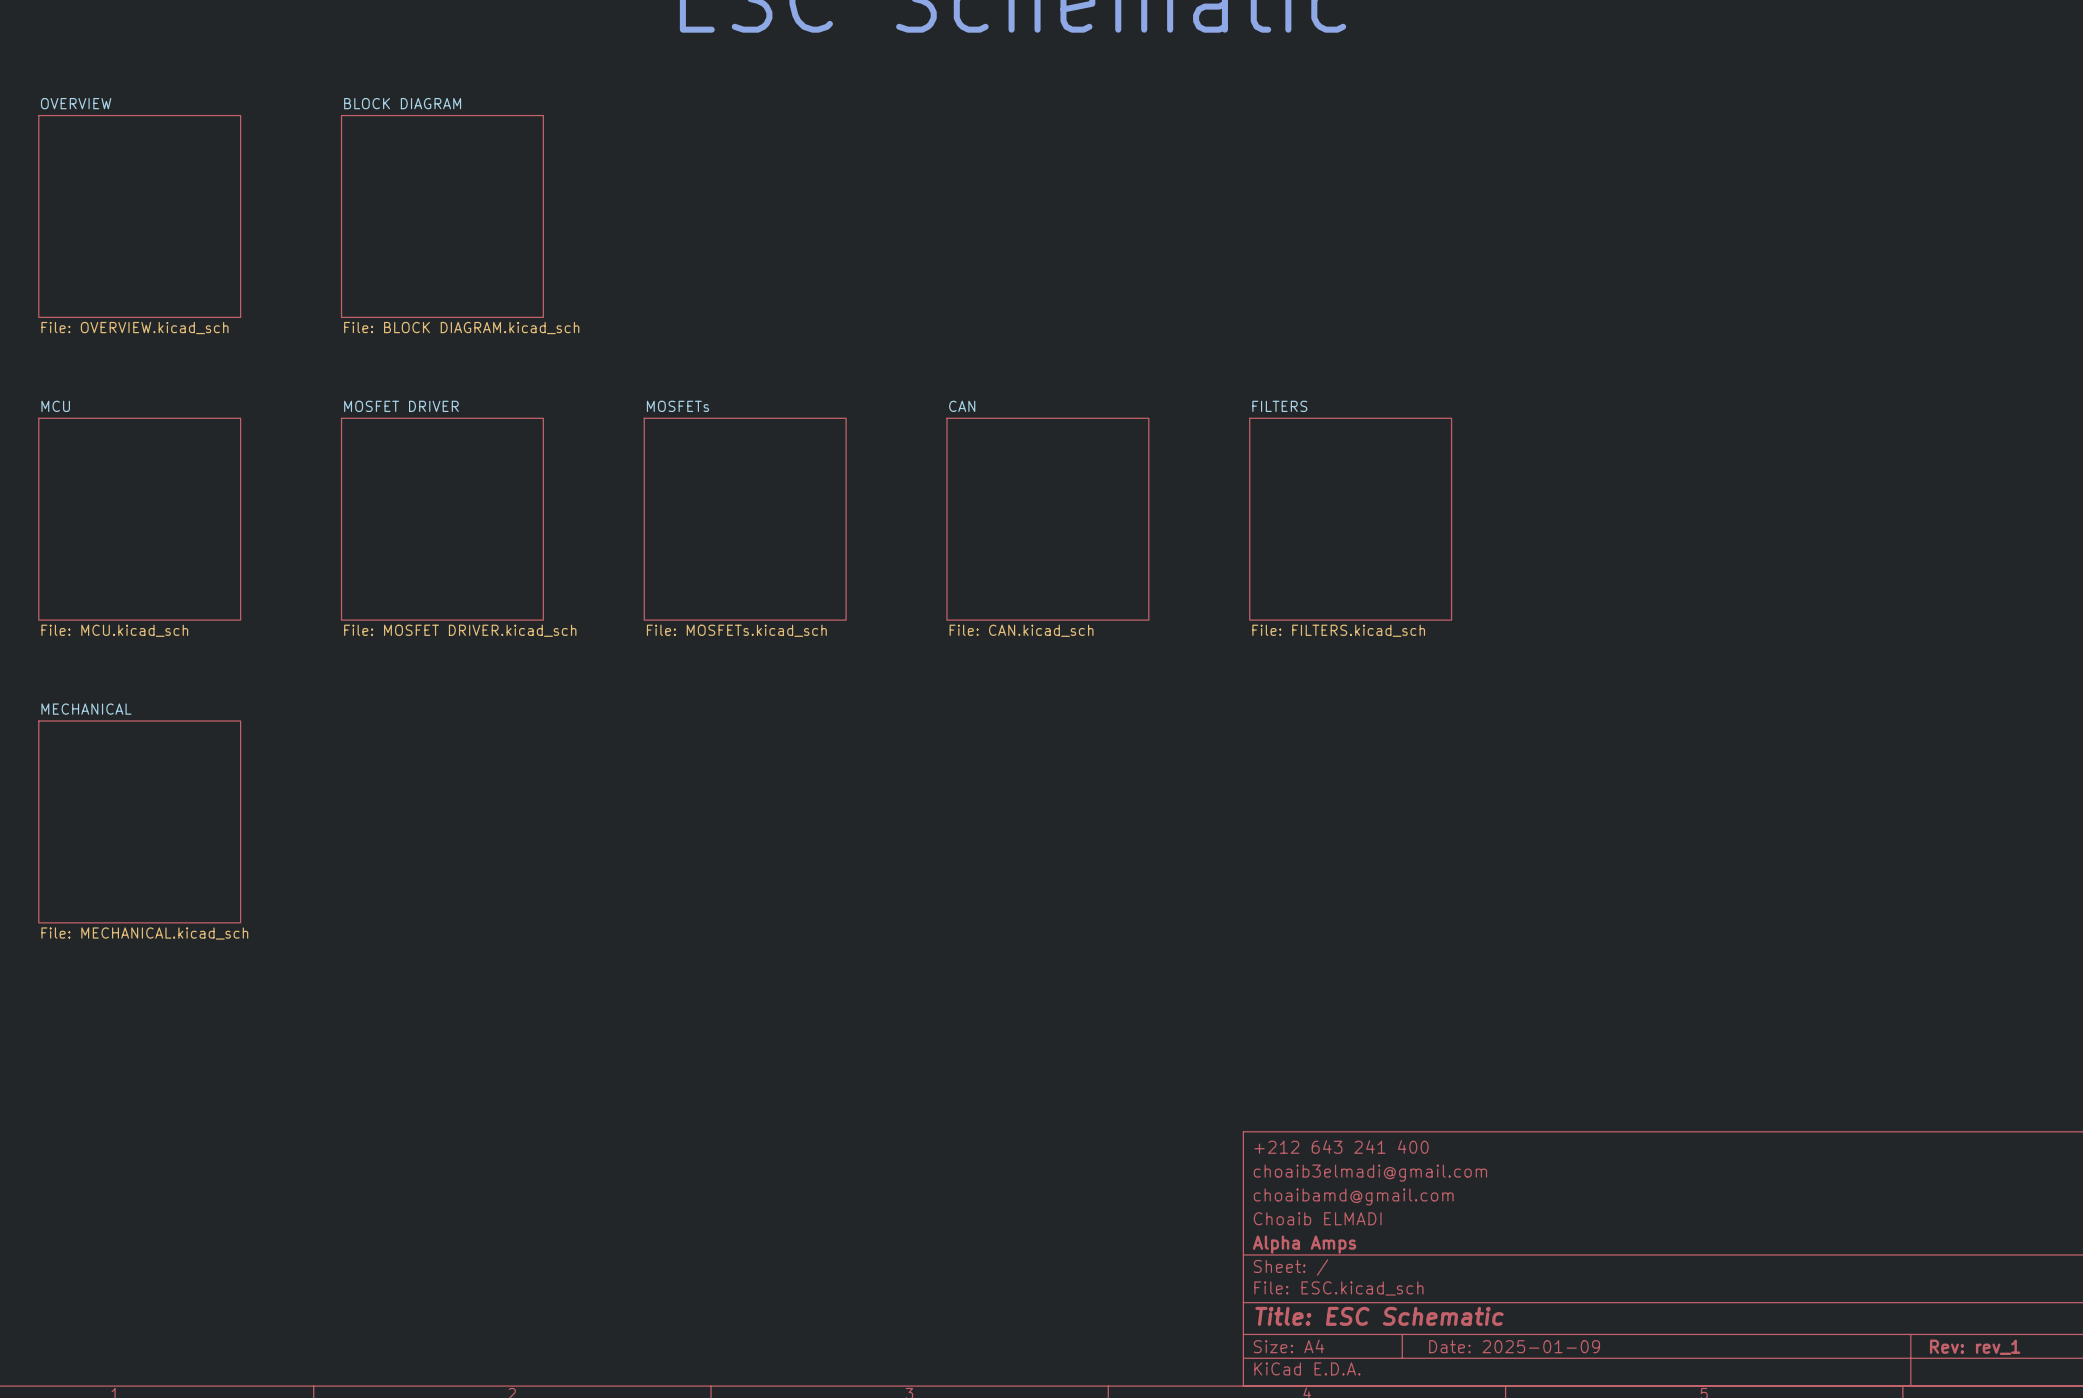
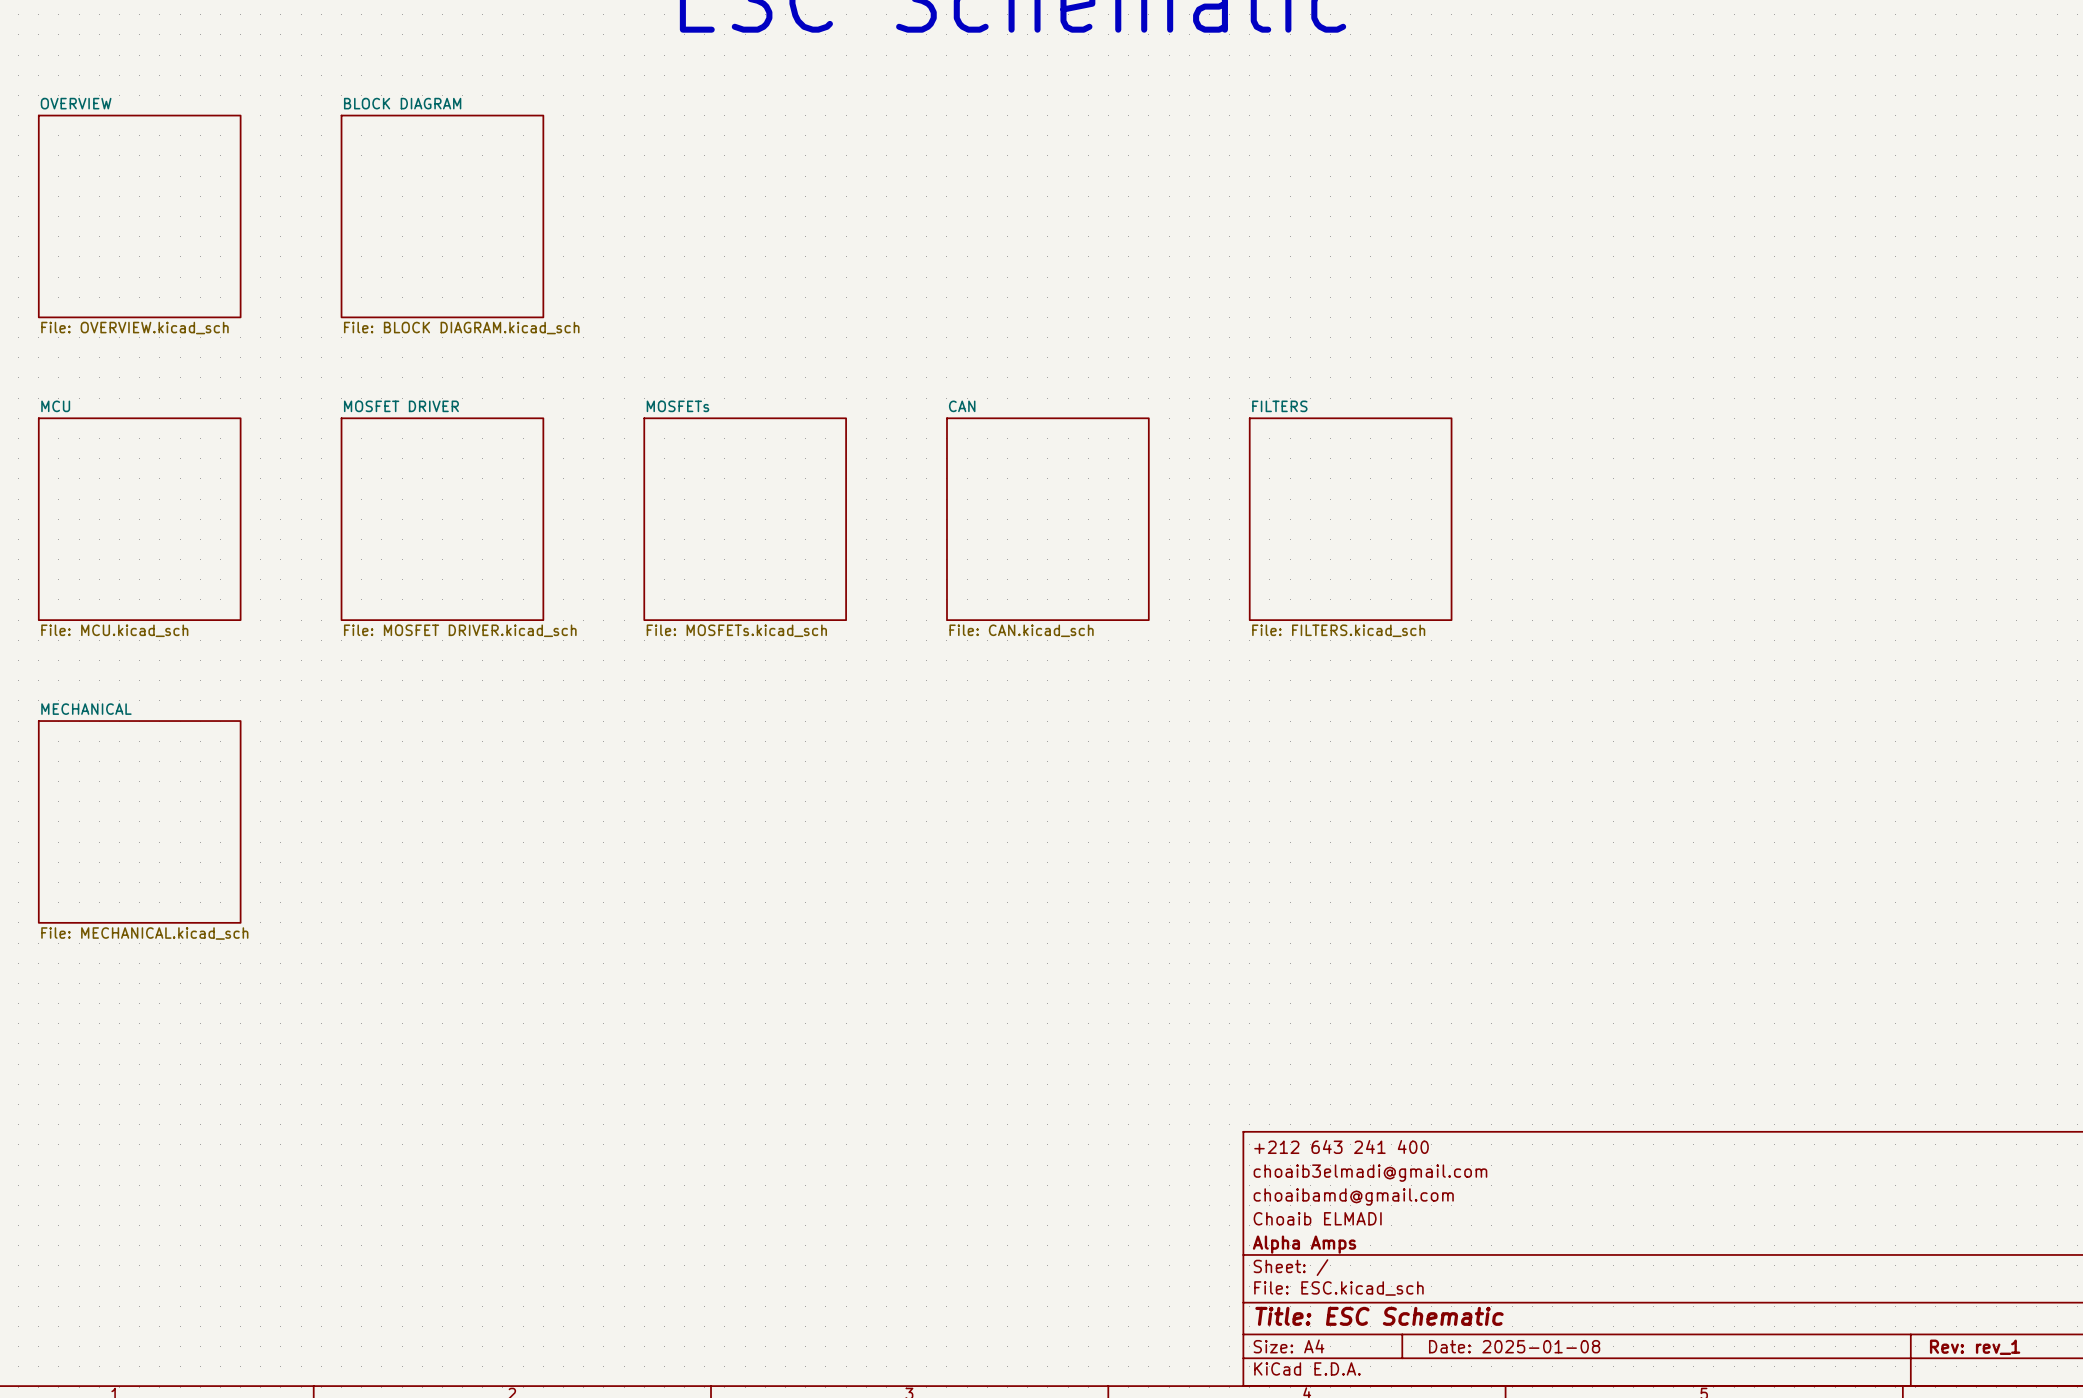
title block: Date: 2025-01-09 (1514, 1346) -> Date: 2025-01-08 (1514, 1346)

